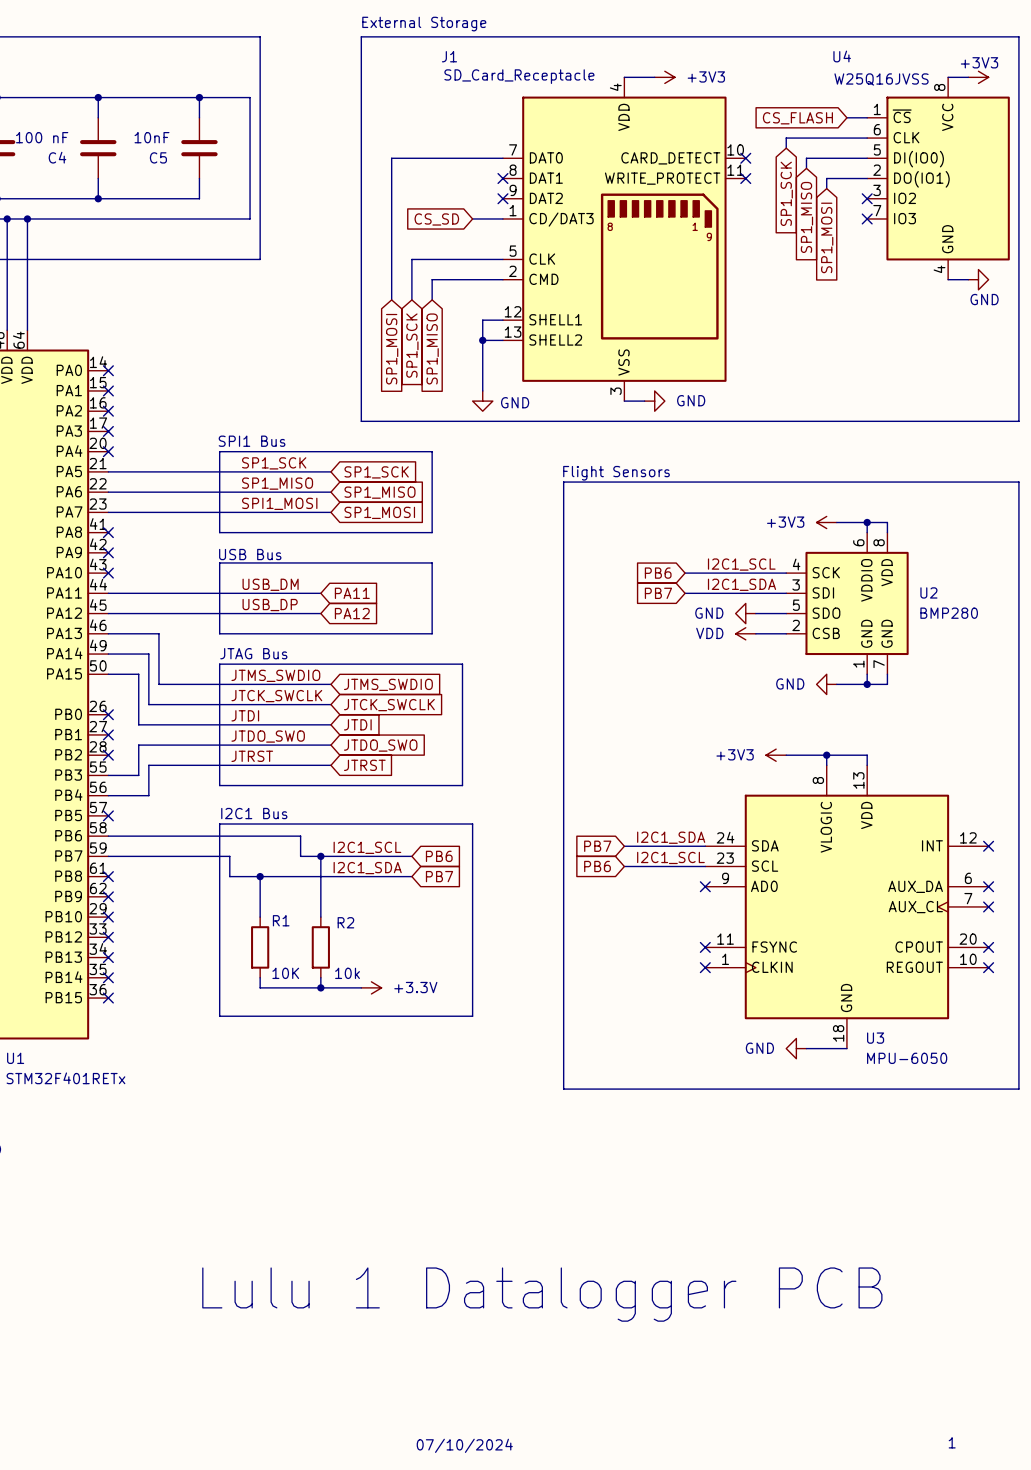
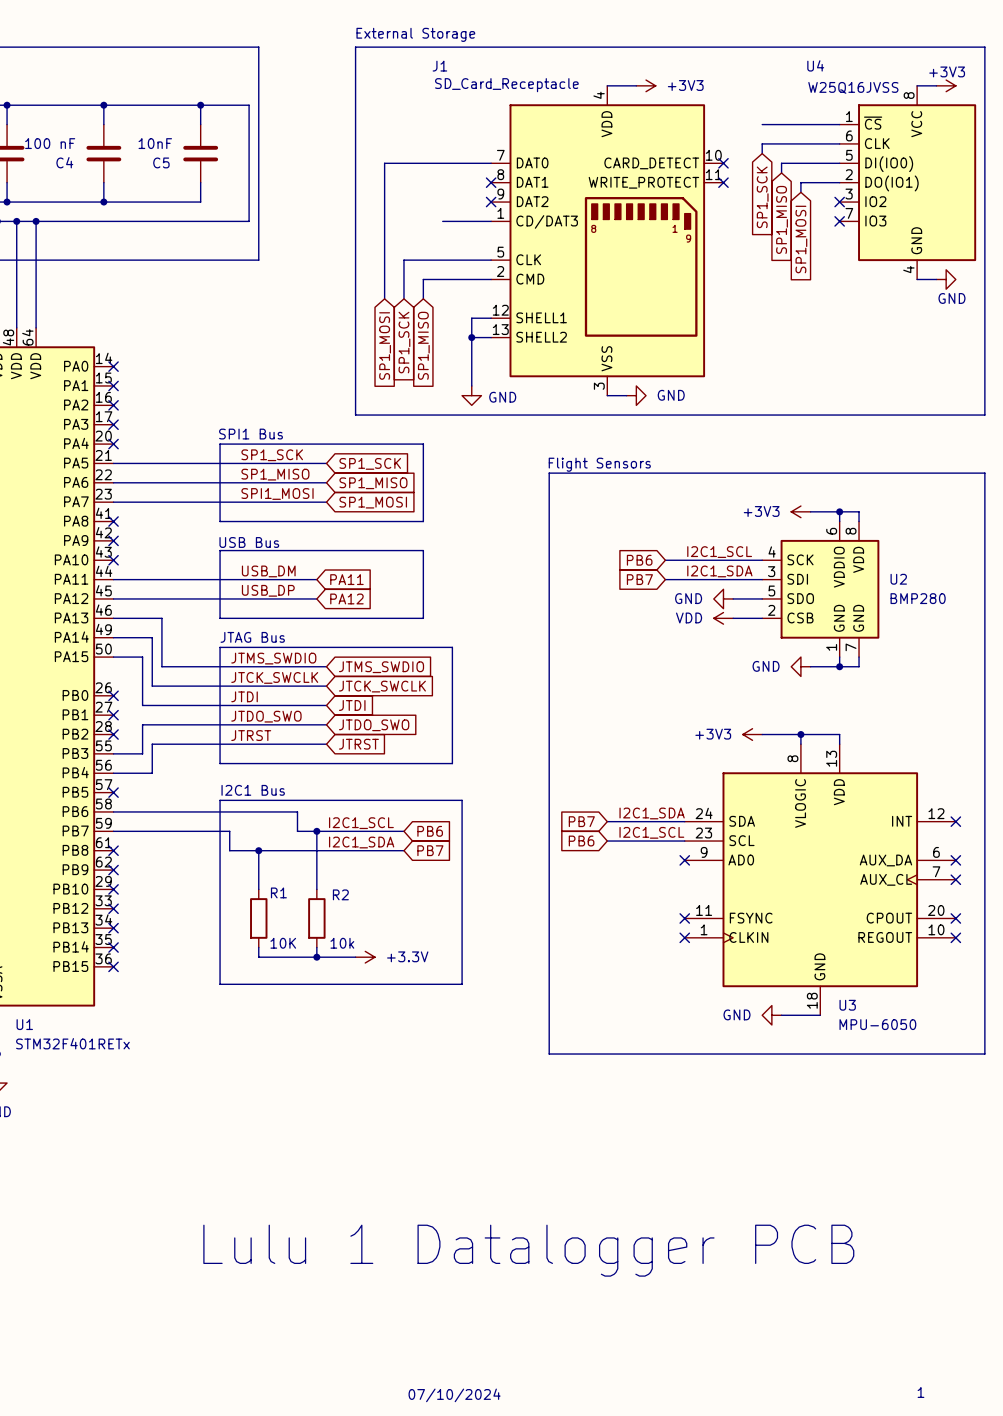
wire: none -> (762, 124) (820, 124)
global label: CS_FLASH (797, 118) -> none
wire: none -> (442, 221) (462, 221)
global label: CS_SD (436, 219) -> none

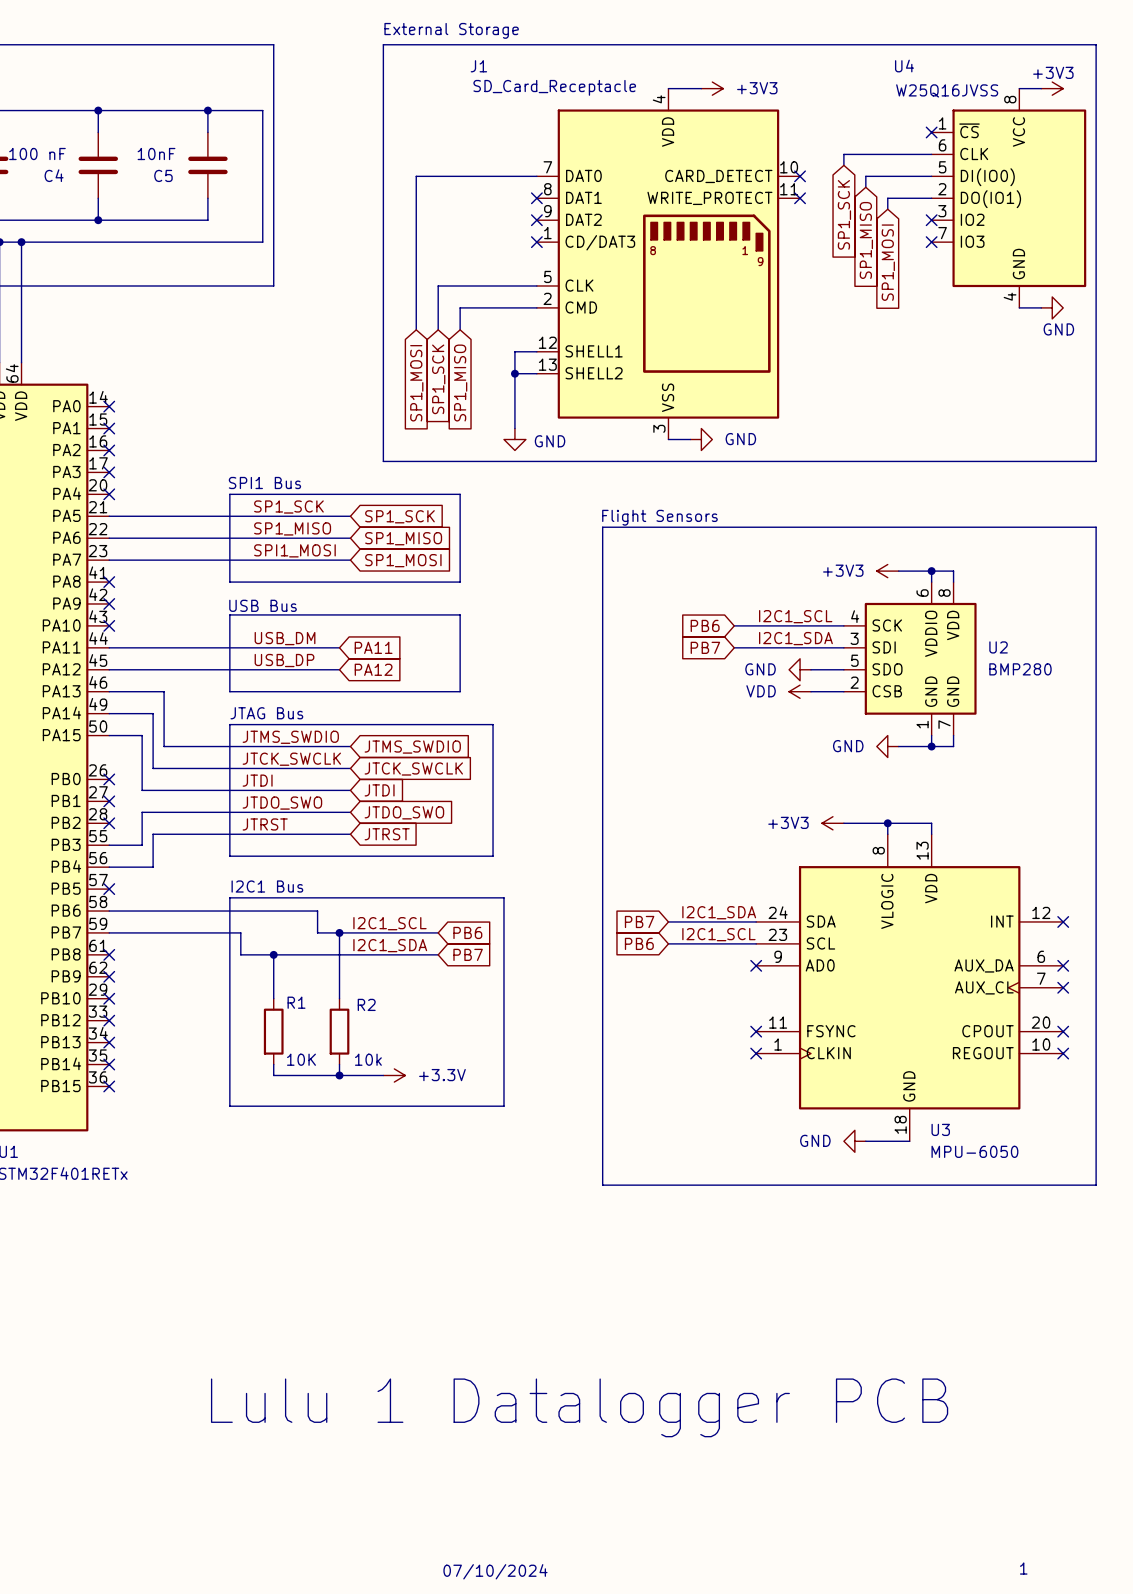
wire: (762, 124) (839, 124) -> none
no-connect mark: none -> (931, 132)
wire: (442, 221) (491, 221) -> none
no-connect mark: none -> (536, 242)

